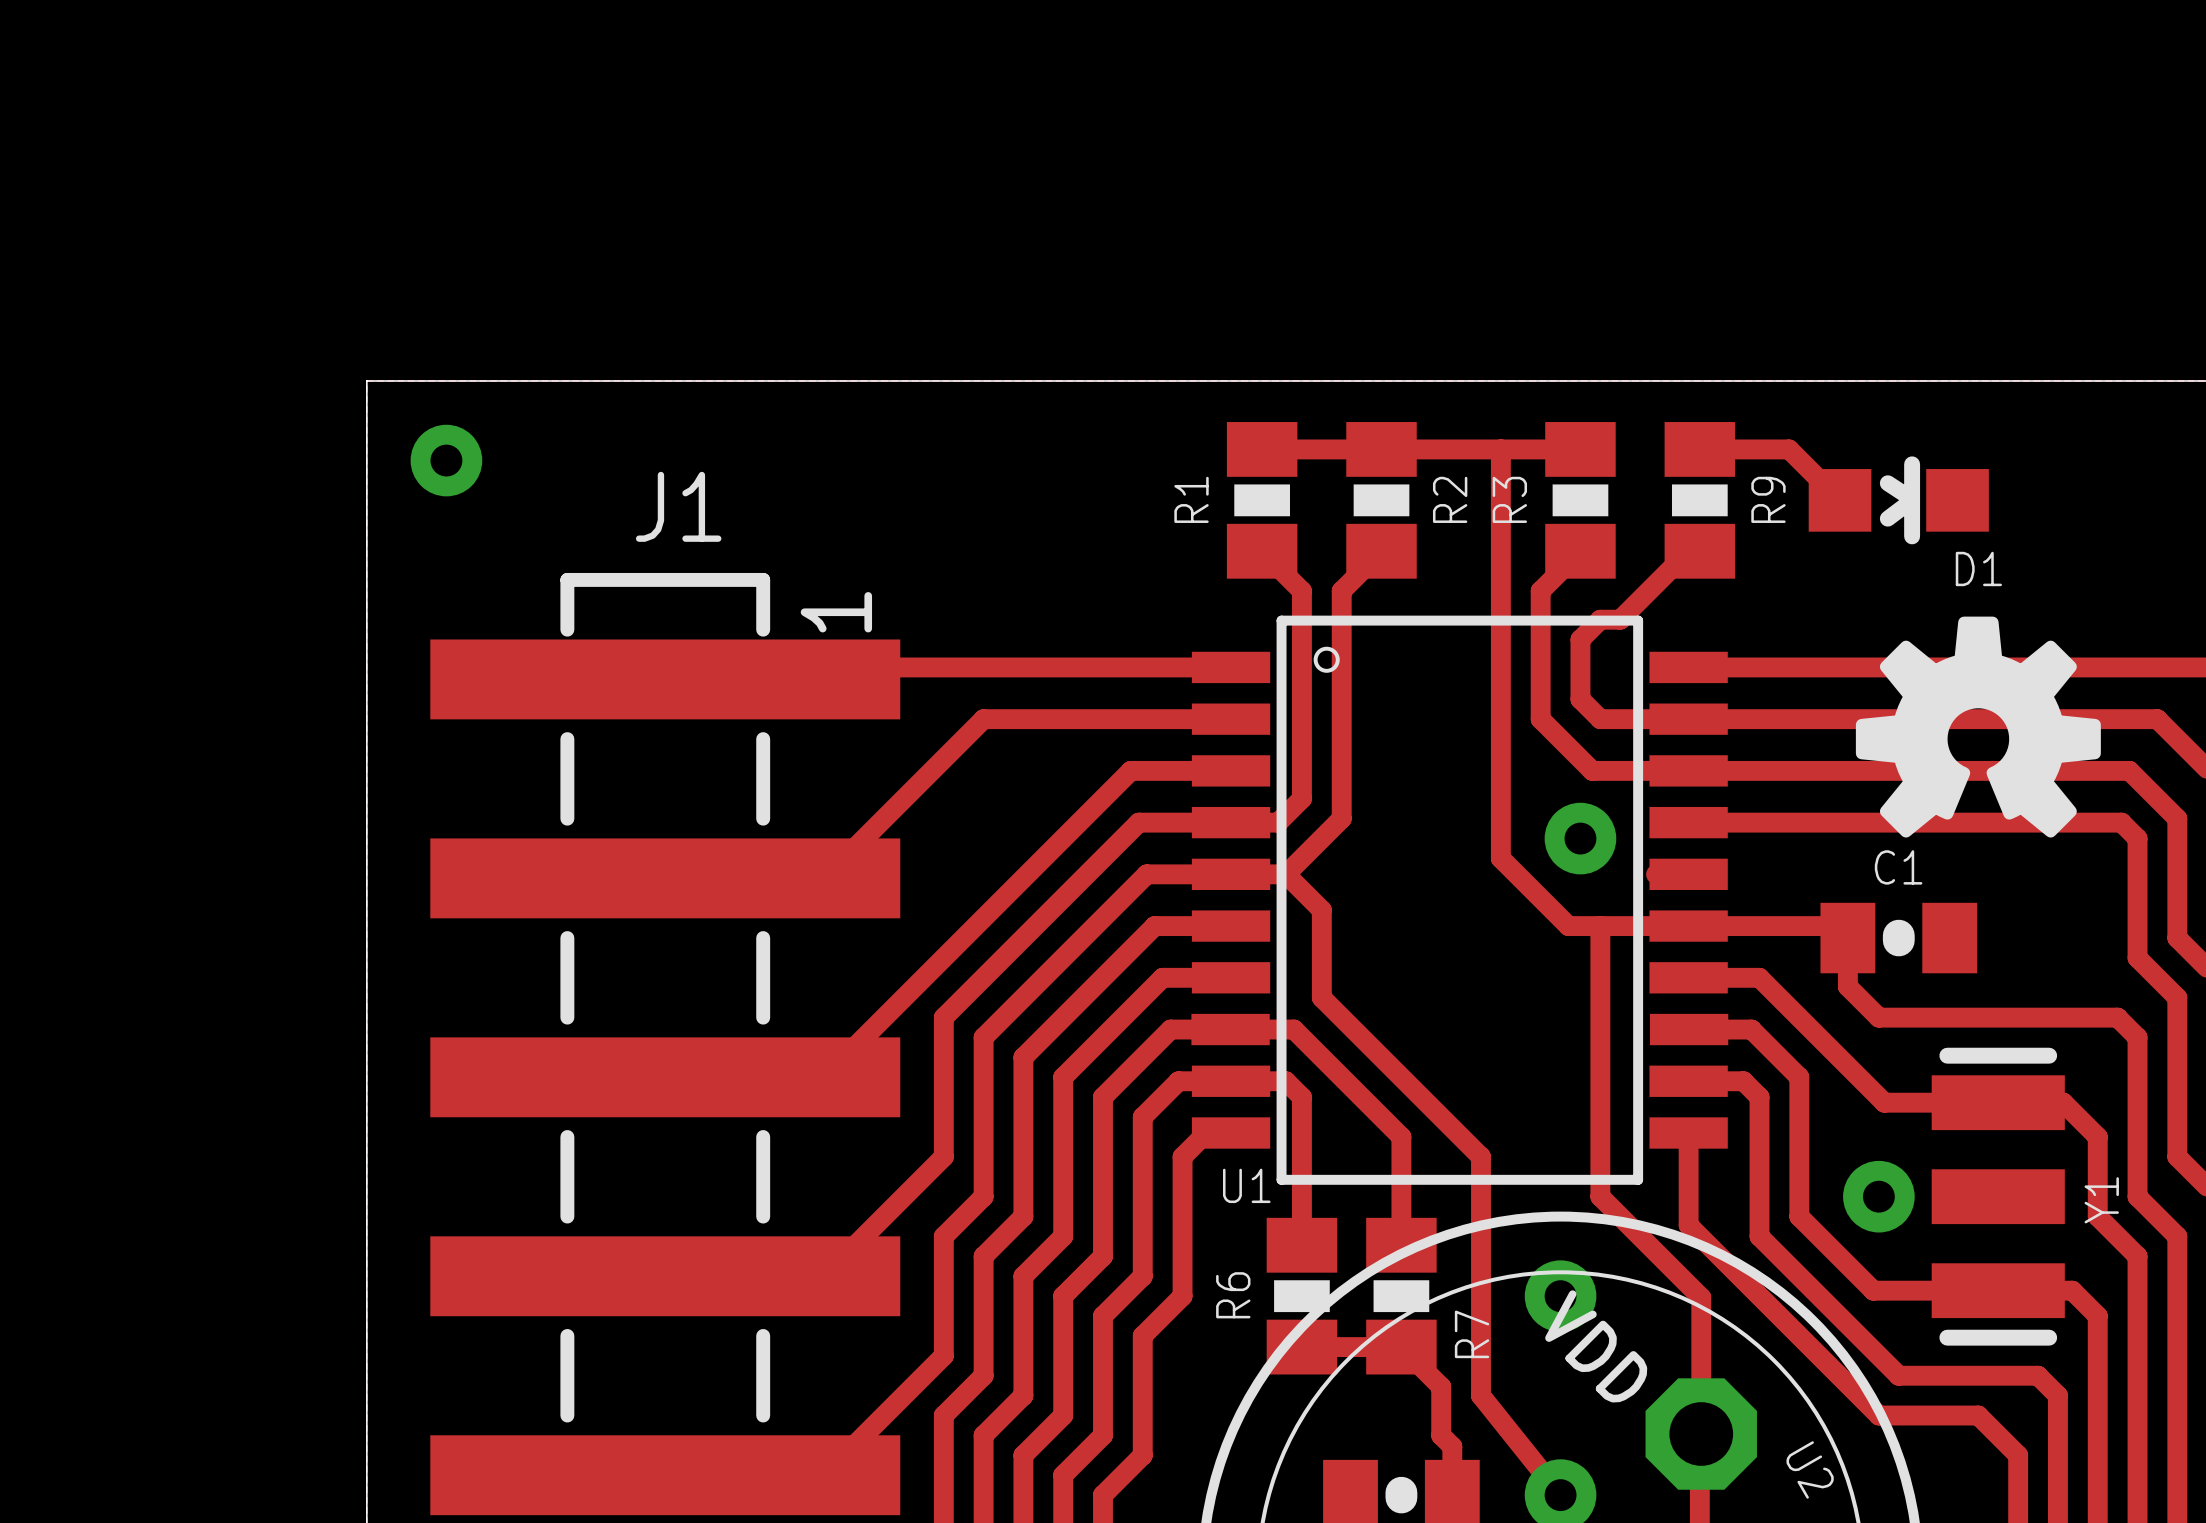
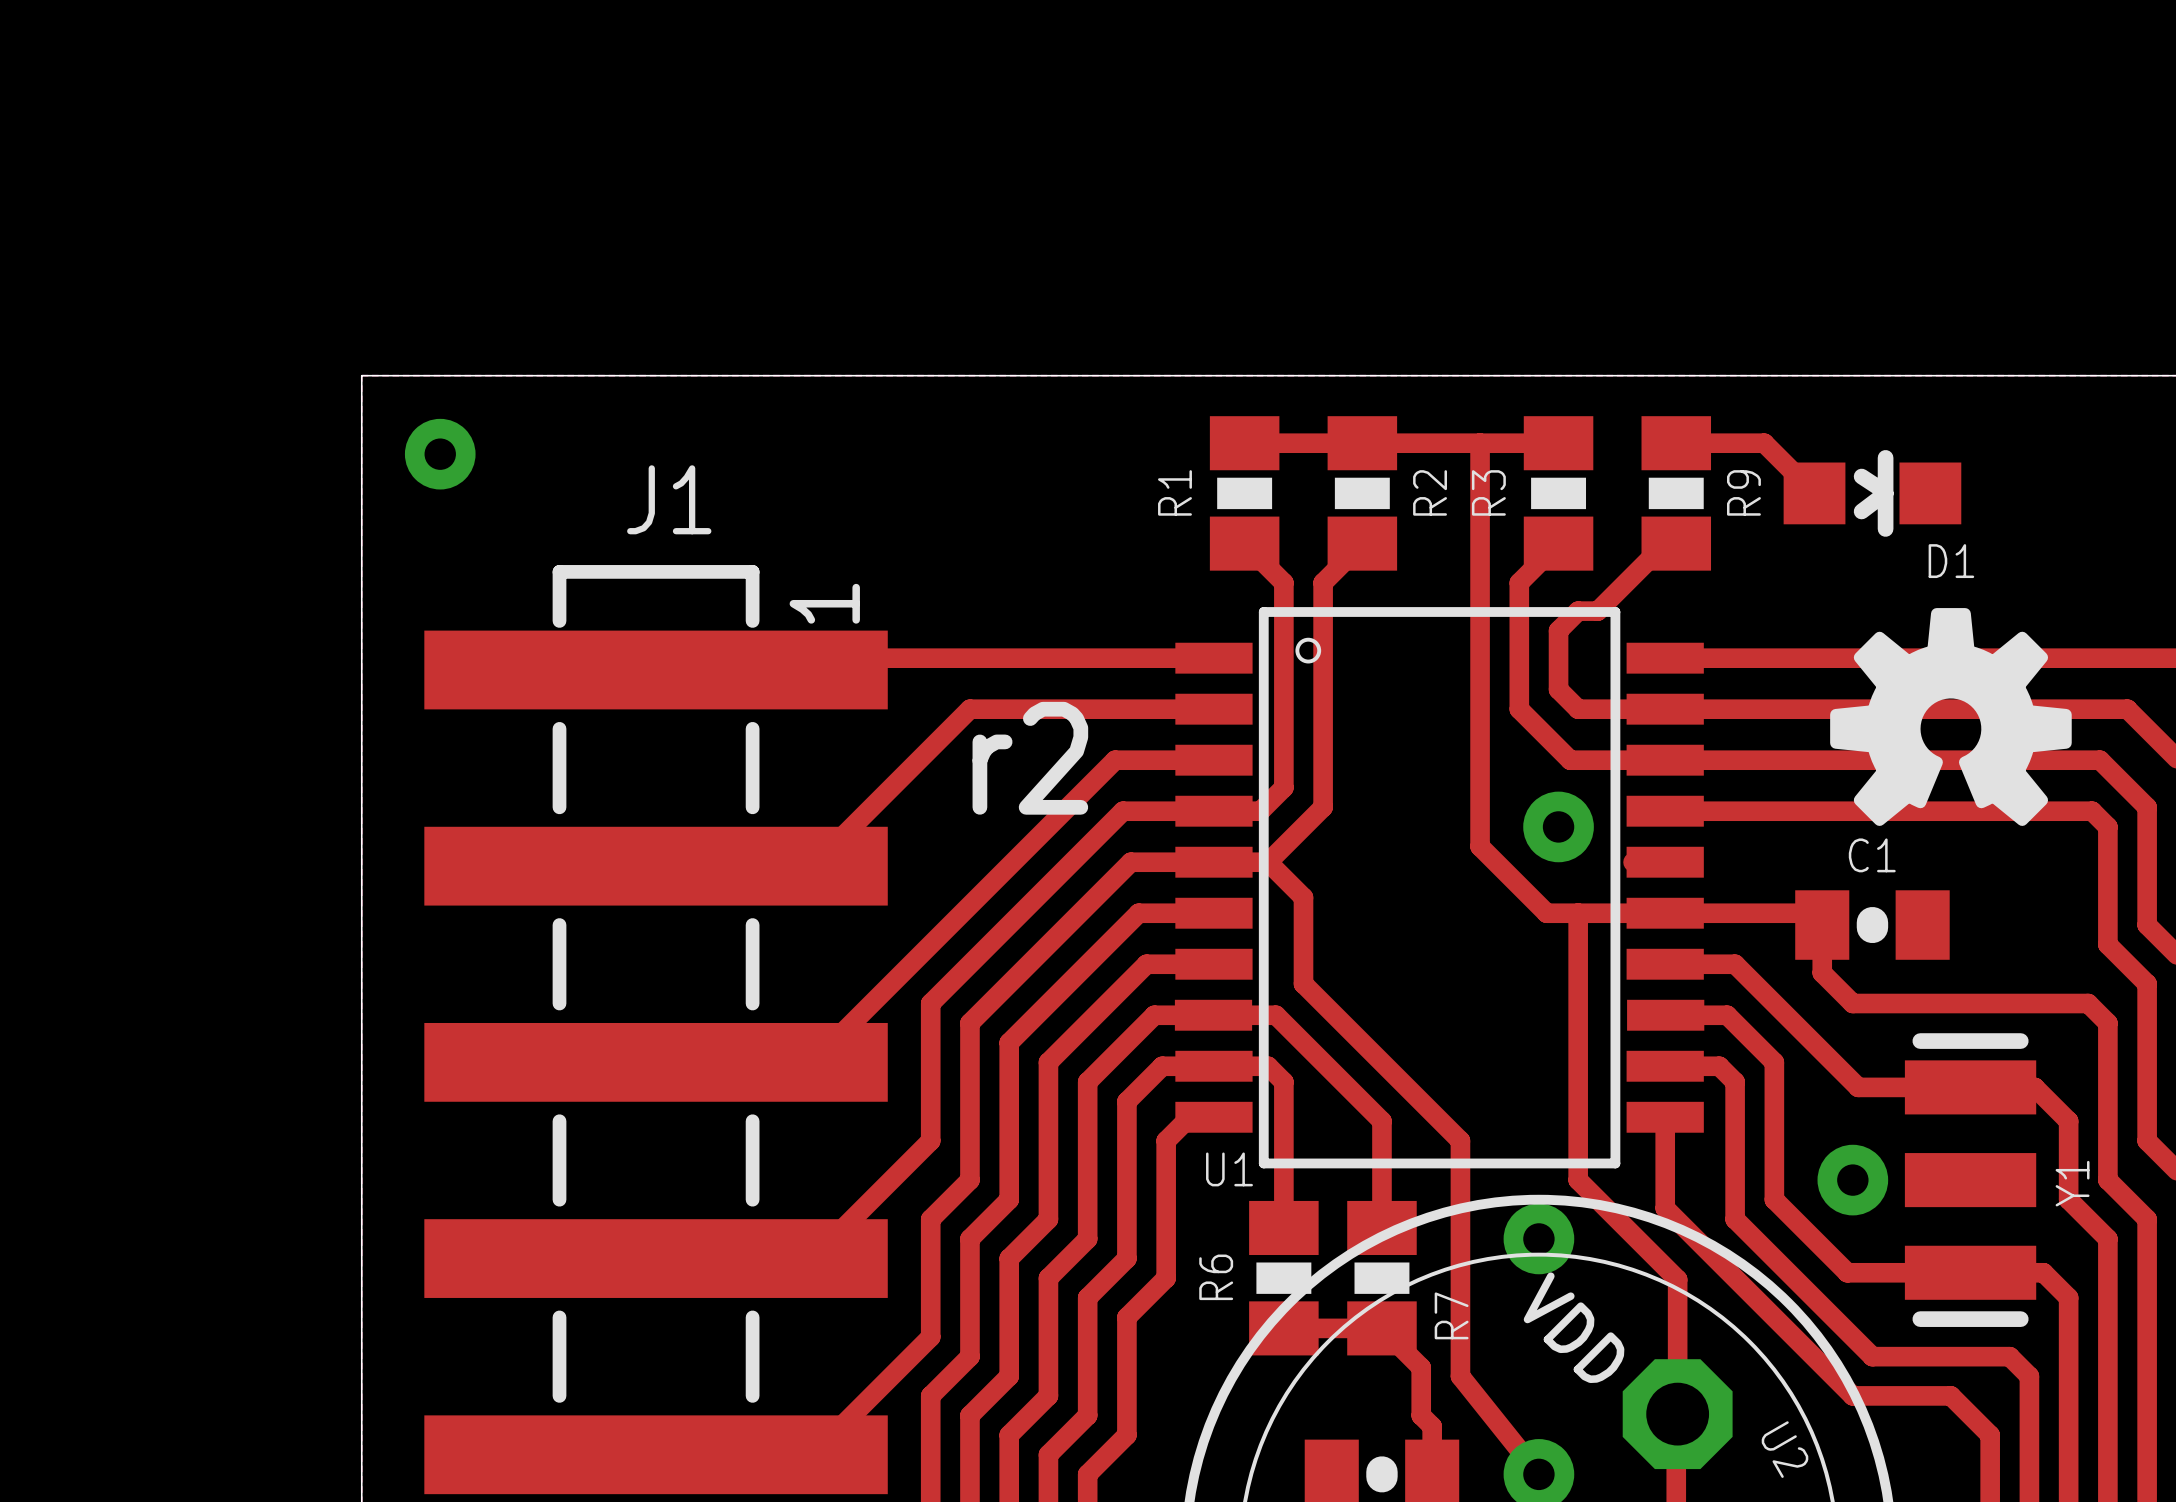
text: none -> r2 (1030, 758)
via position: (1560, 1296) -> (1538, 1238)

